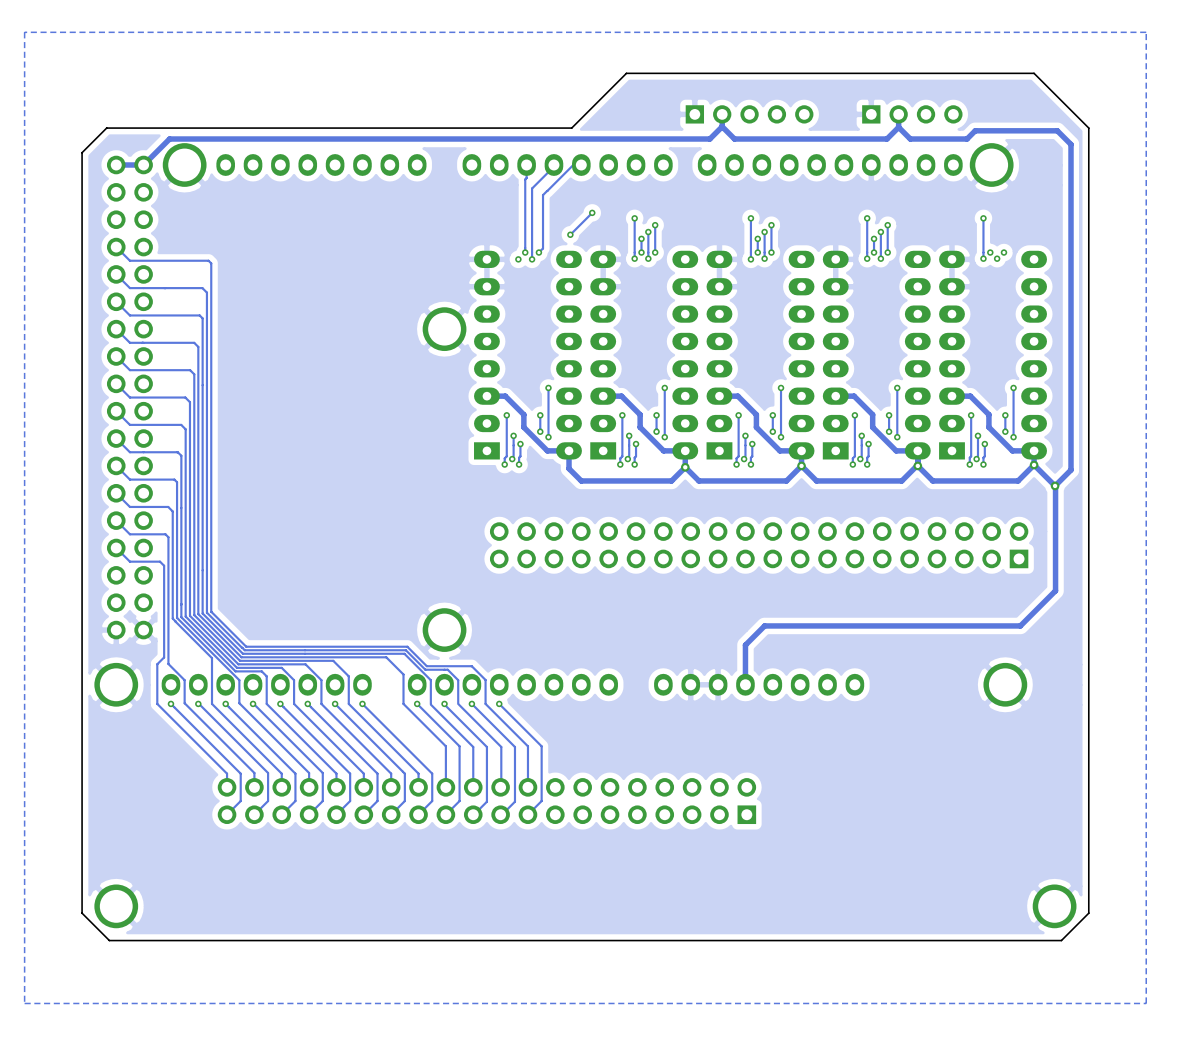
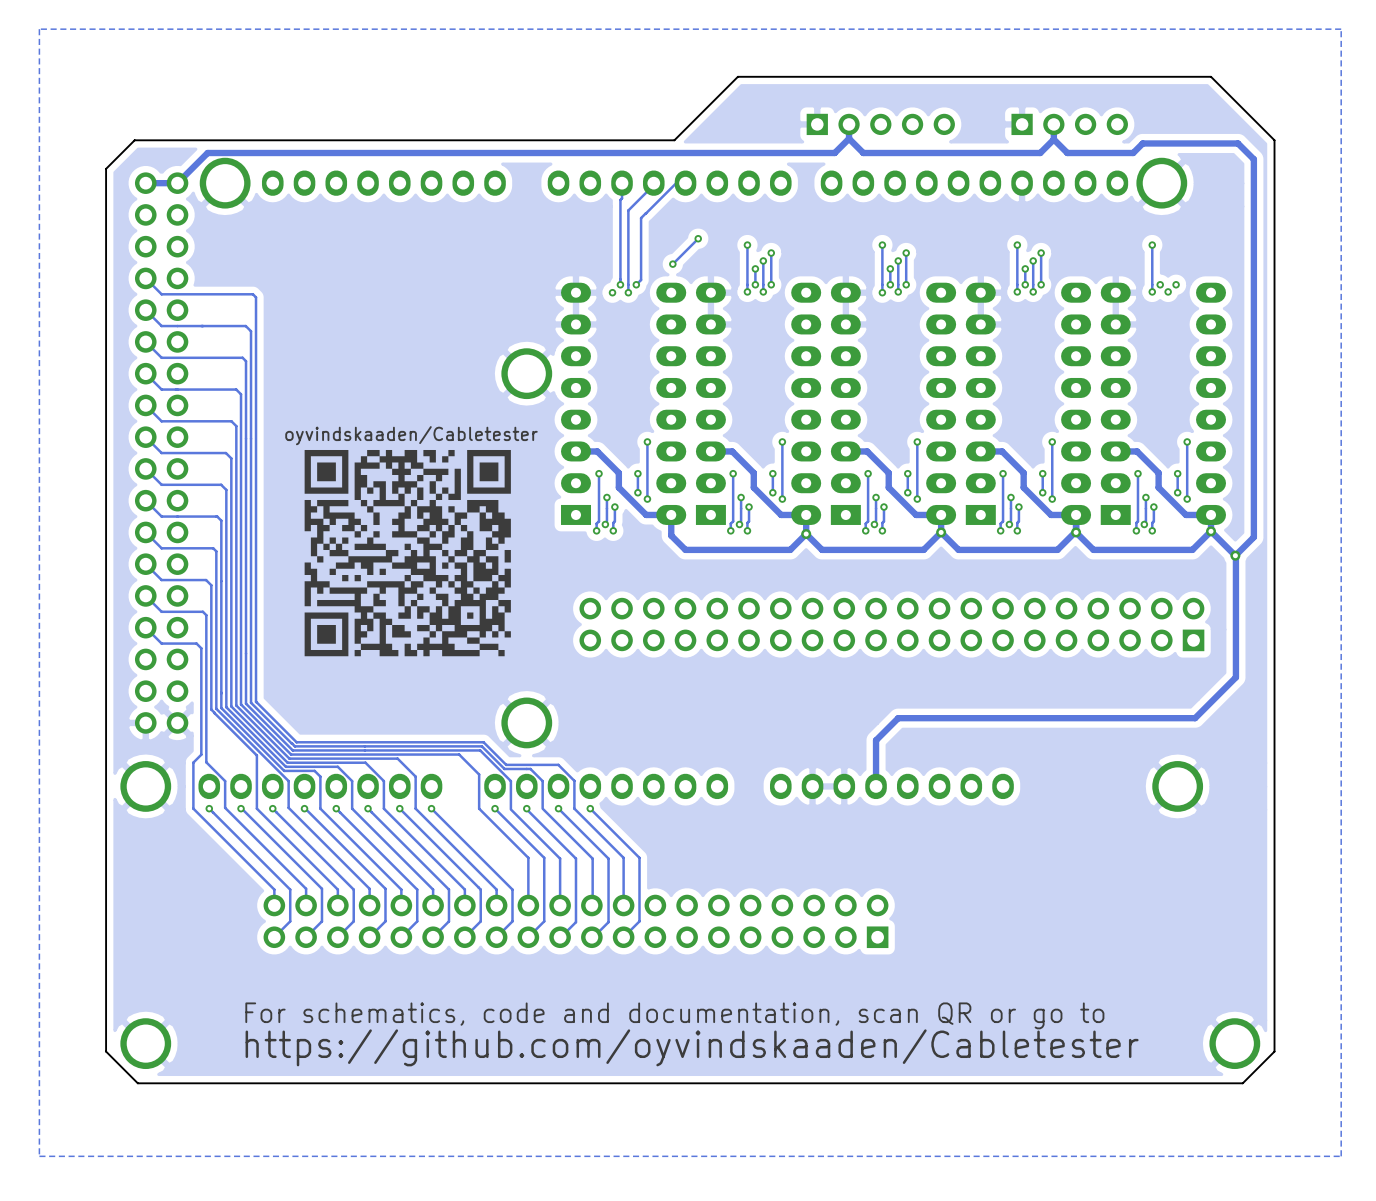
drawing: none -> [304, 449, 511, 657]
text: none -> For schematics, code and documentation, scan QR or go to (674, 1015)
text: none -> https://github.com/oyvindskaaden/Cabletester (692, 1047)

